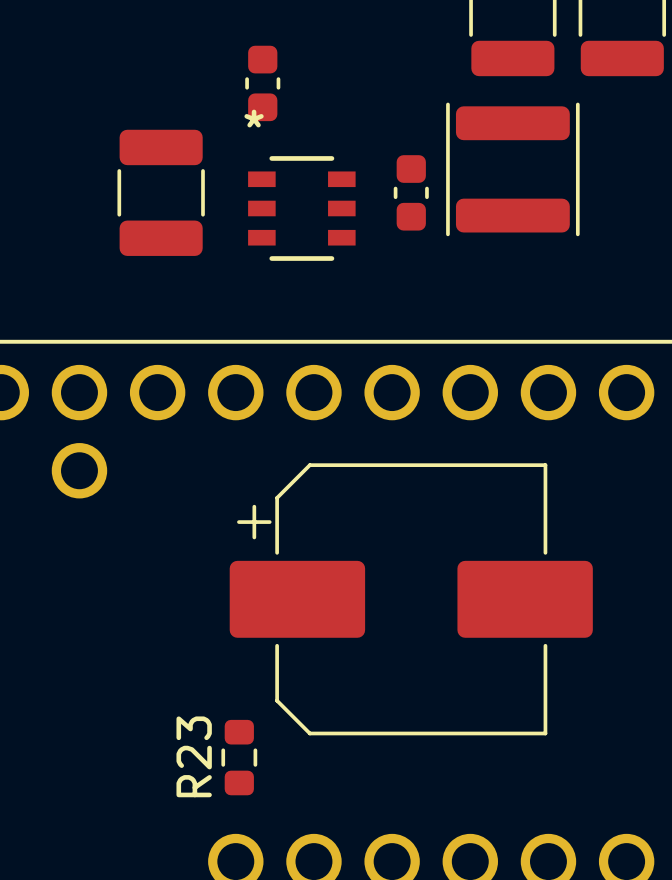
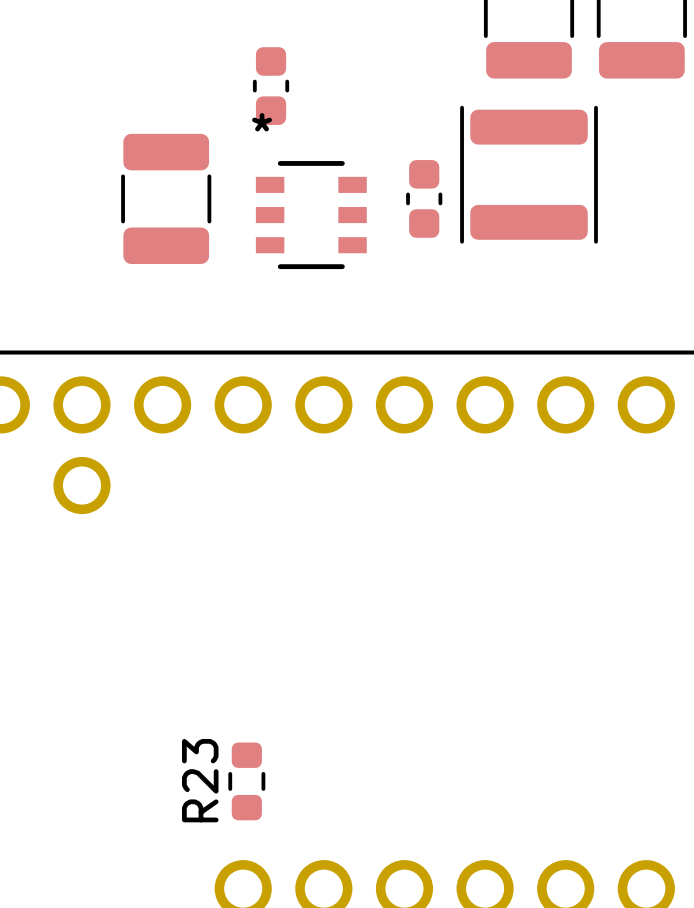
part: (411, 599) -> none

